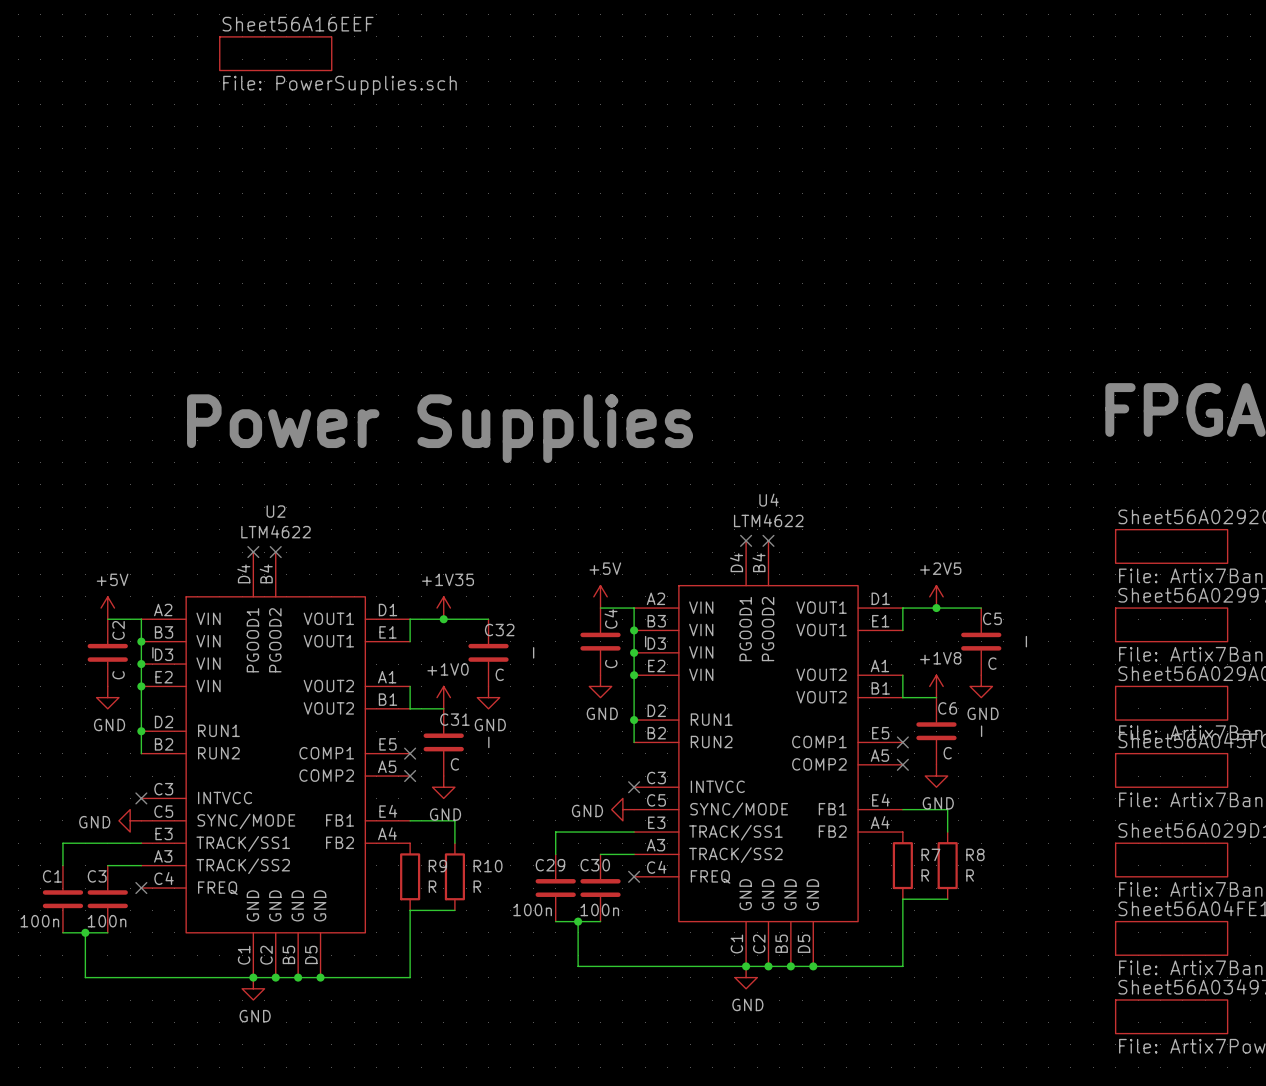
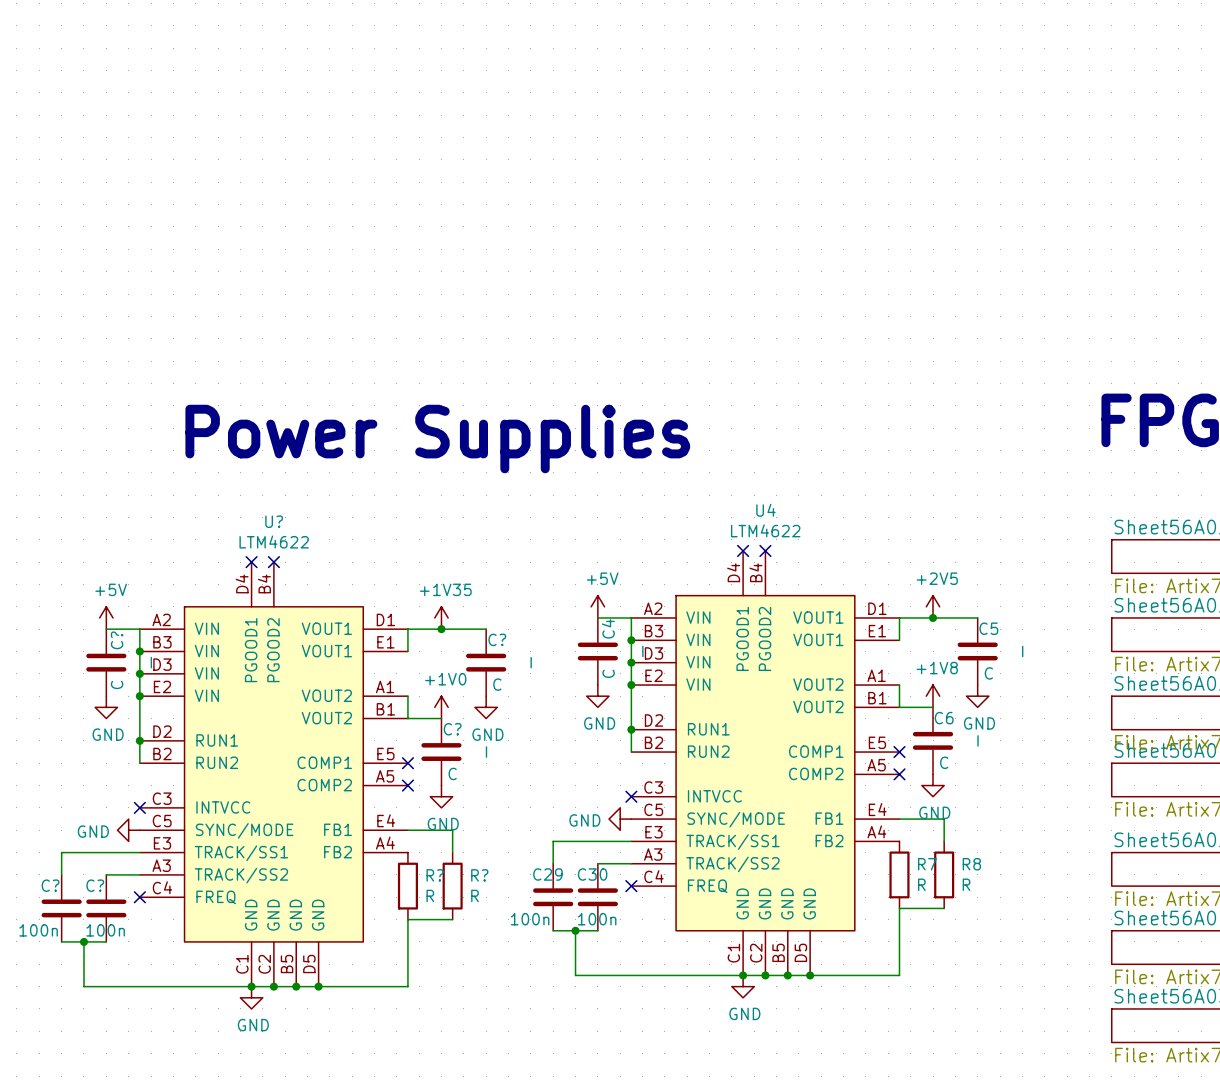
sheet Sheet56A16EEF: File: PowerSupplies.sch (275, 53) -> none
U2 name: U2 (276, 511) -> U? (274, 521)
C2 name: C2 (118, 630) -> C? (117, 640)
C32 name: C32 (499, 630) -> C? (497, 639)
C31 name: C31 (454, 719) -> C? (452, 729)
R9 name: R9 (437, 866) -> R? (435, 875)
R10 name: R10 (488, 866) -> R? (479, 875)
C1 name: C1 (52, 876) -> C? (50, 885)
C3 name: C3 (97, 876) -> C? (95, 885)

